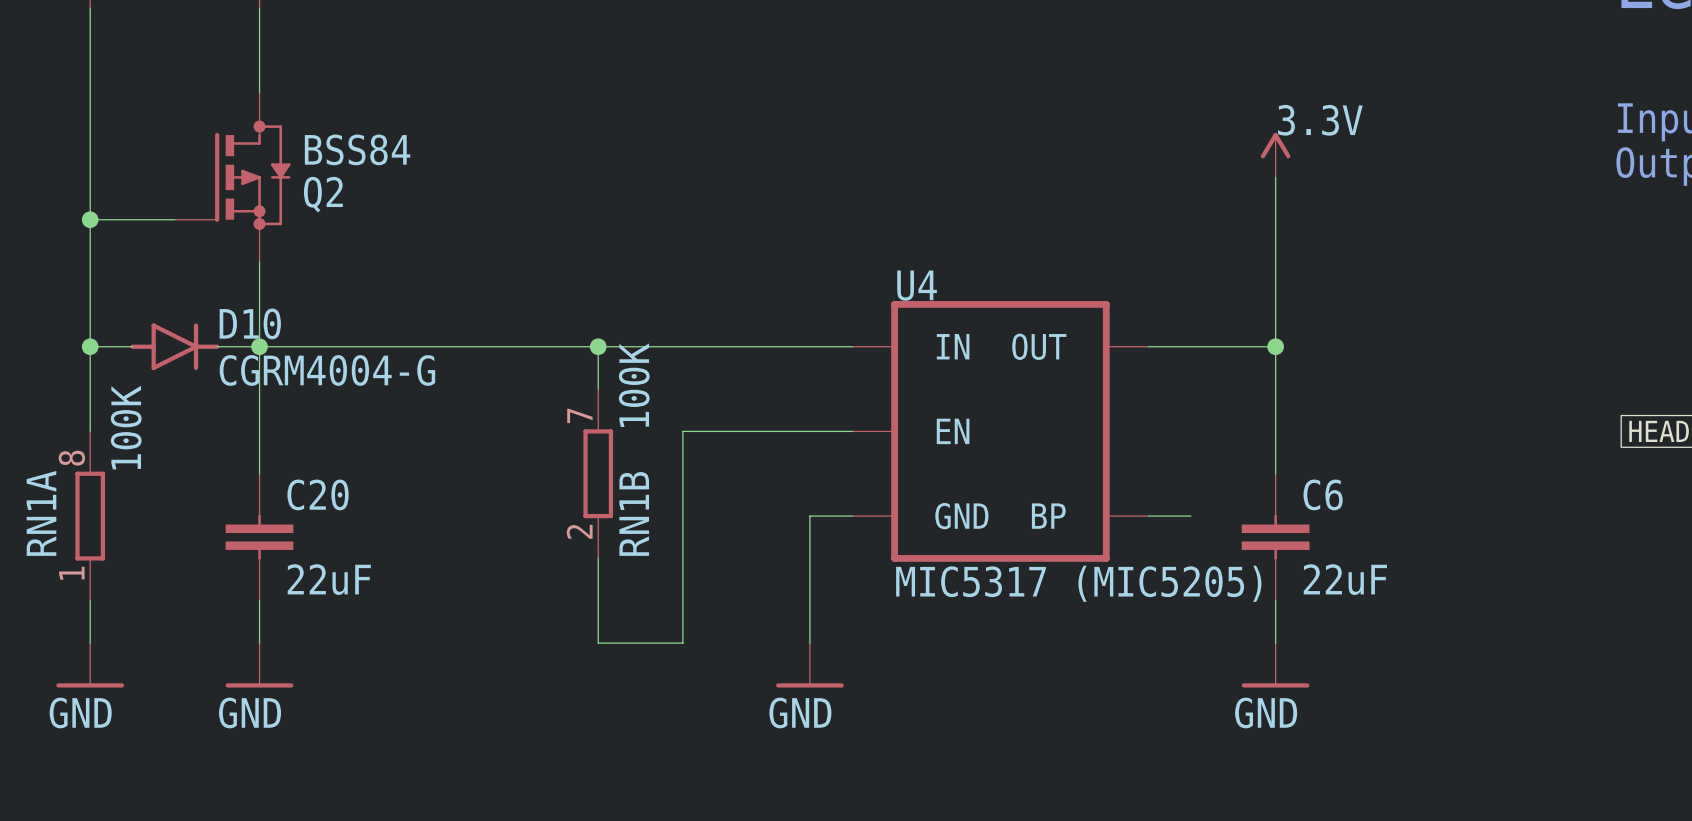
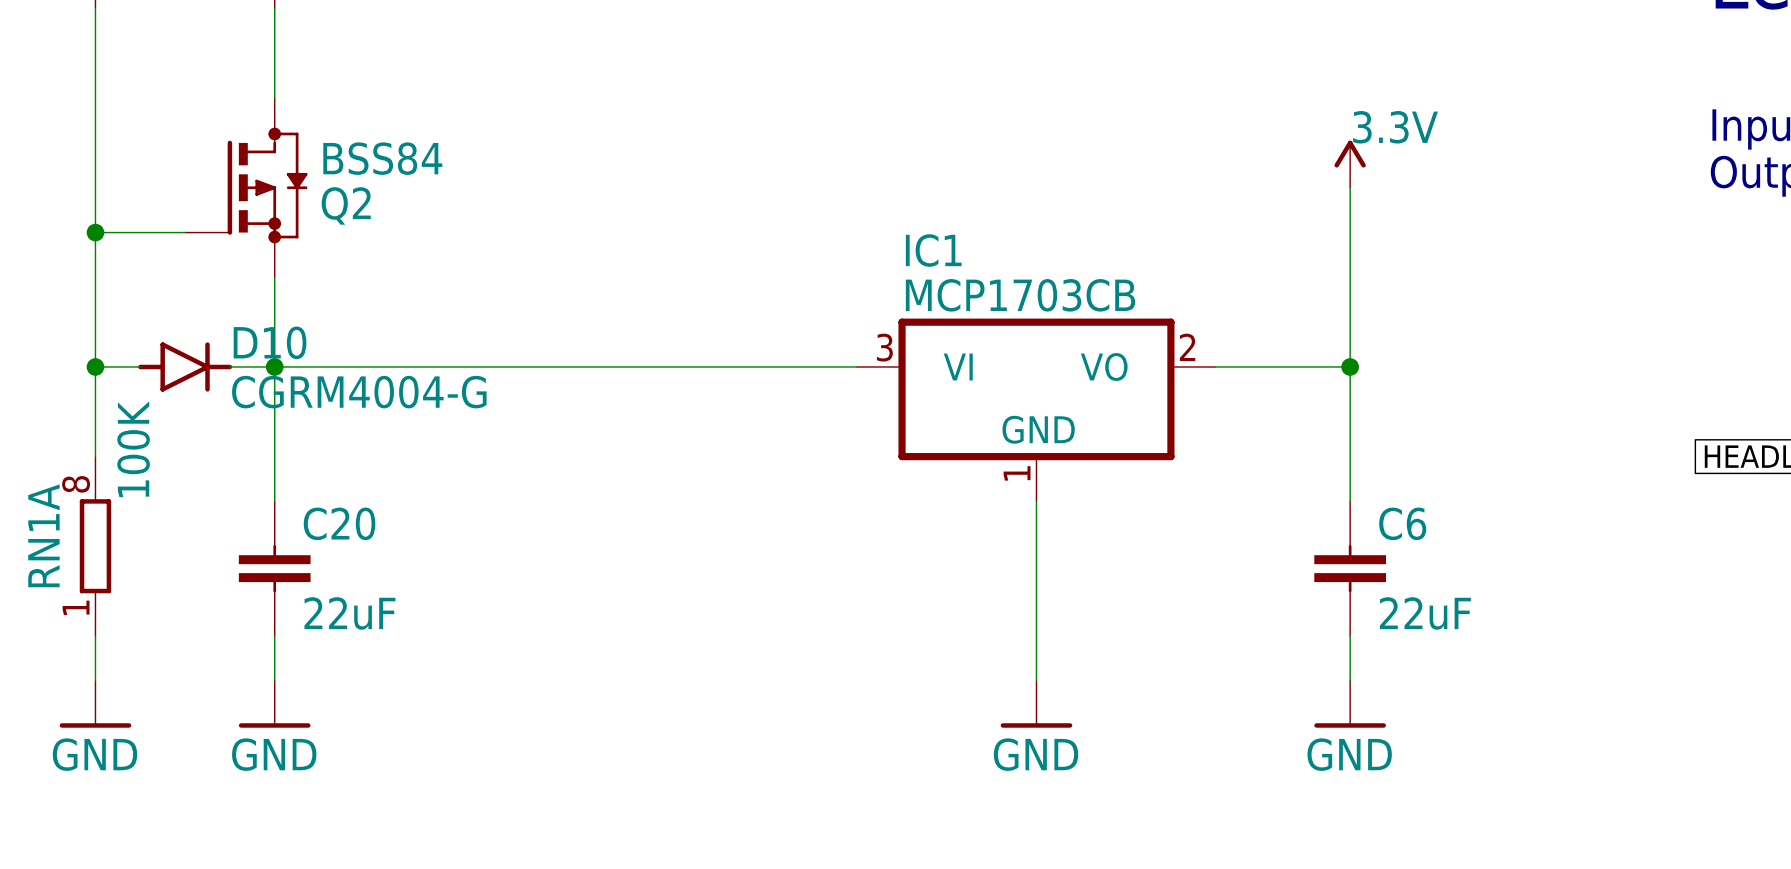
wire: (598, 346) (598, 389) -> none
junction: (598, 346) -> none
IC1: none -> MCP1703CB (1036, 410)
wire: (852, 431) (682, 431) (682, 643) (598, 643) (598, 558) -> none
U4: MIC5317 (MIC5205) (1000, 431) -> none
RN1B: 100K (598, 473) -> none
wire: none -> (1036, 501) (1036, 680)
wire: (852, 516) (809, 516) (809, 643) -> none
wire: (1148, 516) (1190, 516) -> none
power symbol position: GND (809, 665) -> GND (1036, 704)

